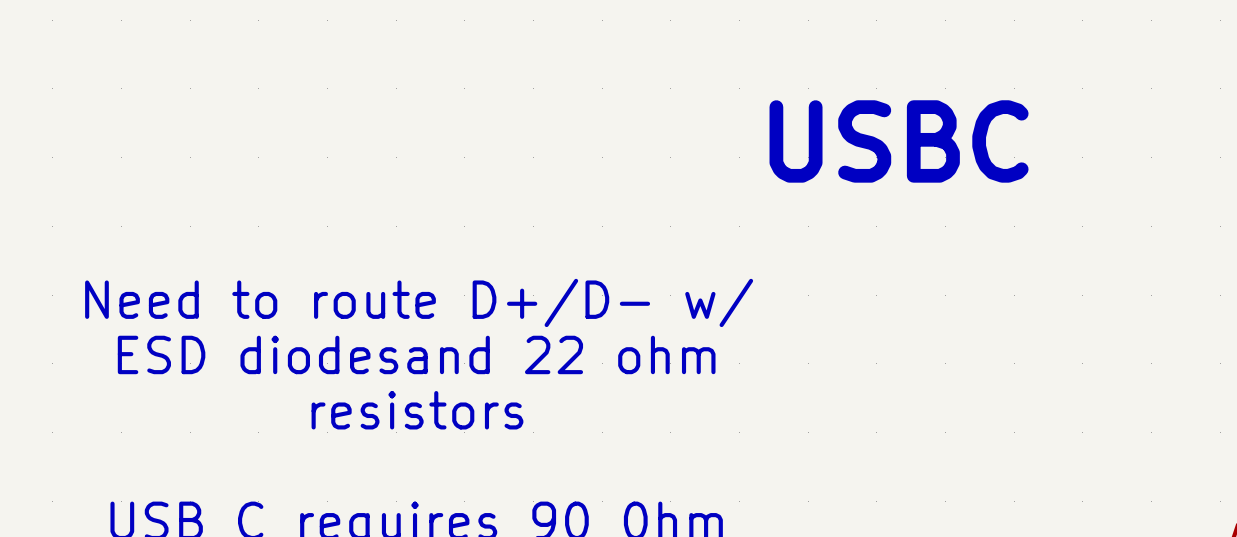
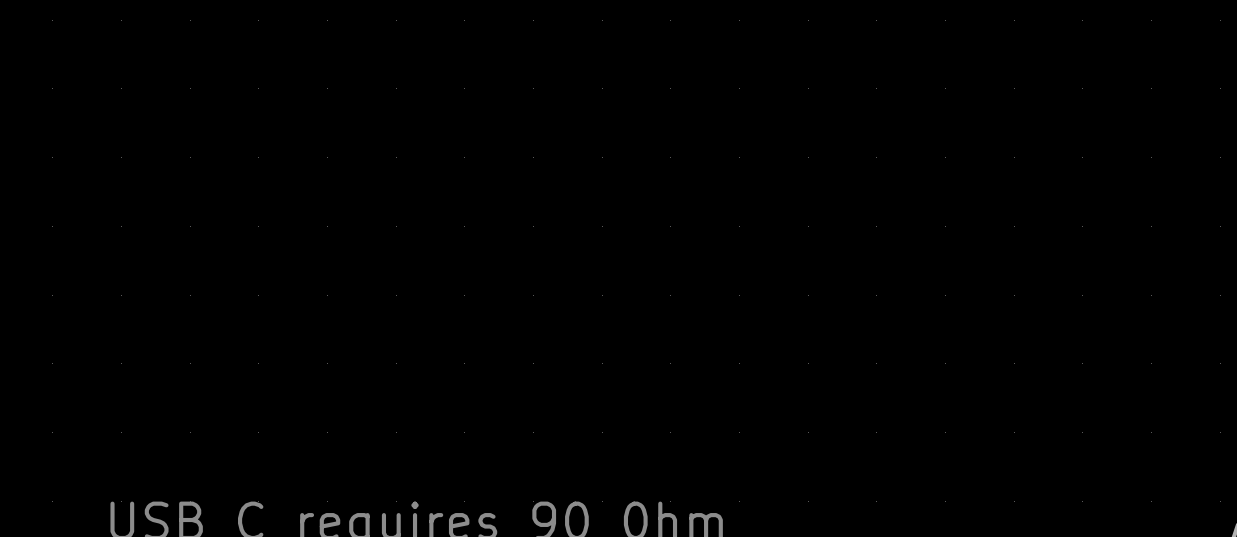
text: USBC (899, 141) -> none
text: Need to route D+/D- w/ (419, 302) -> none
text: ESD diodesand 22 ohm (416, 354) -> none
text: resistors (417, 410) -> none

